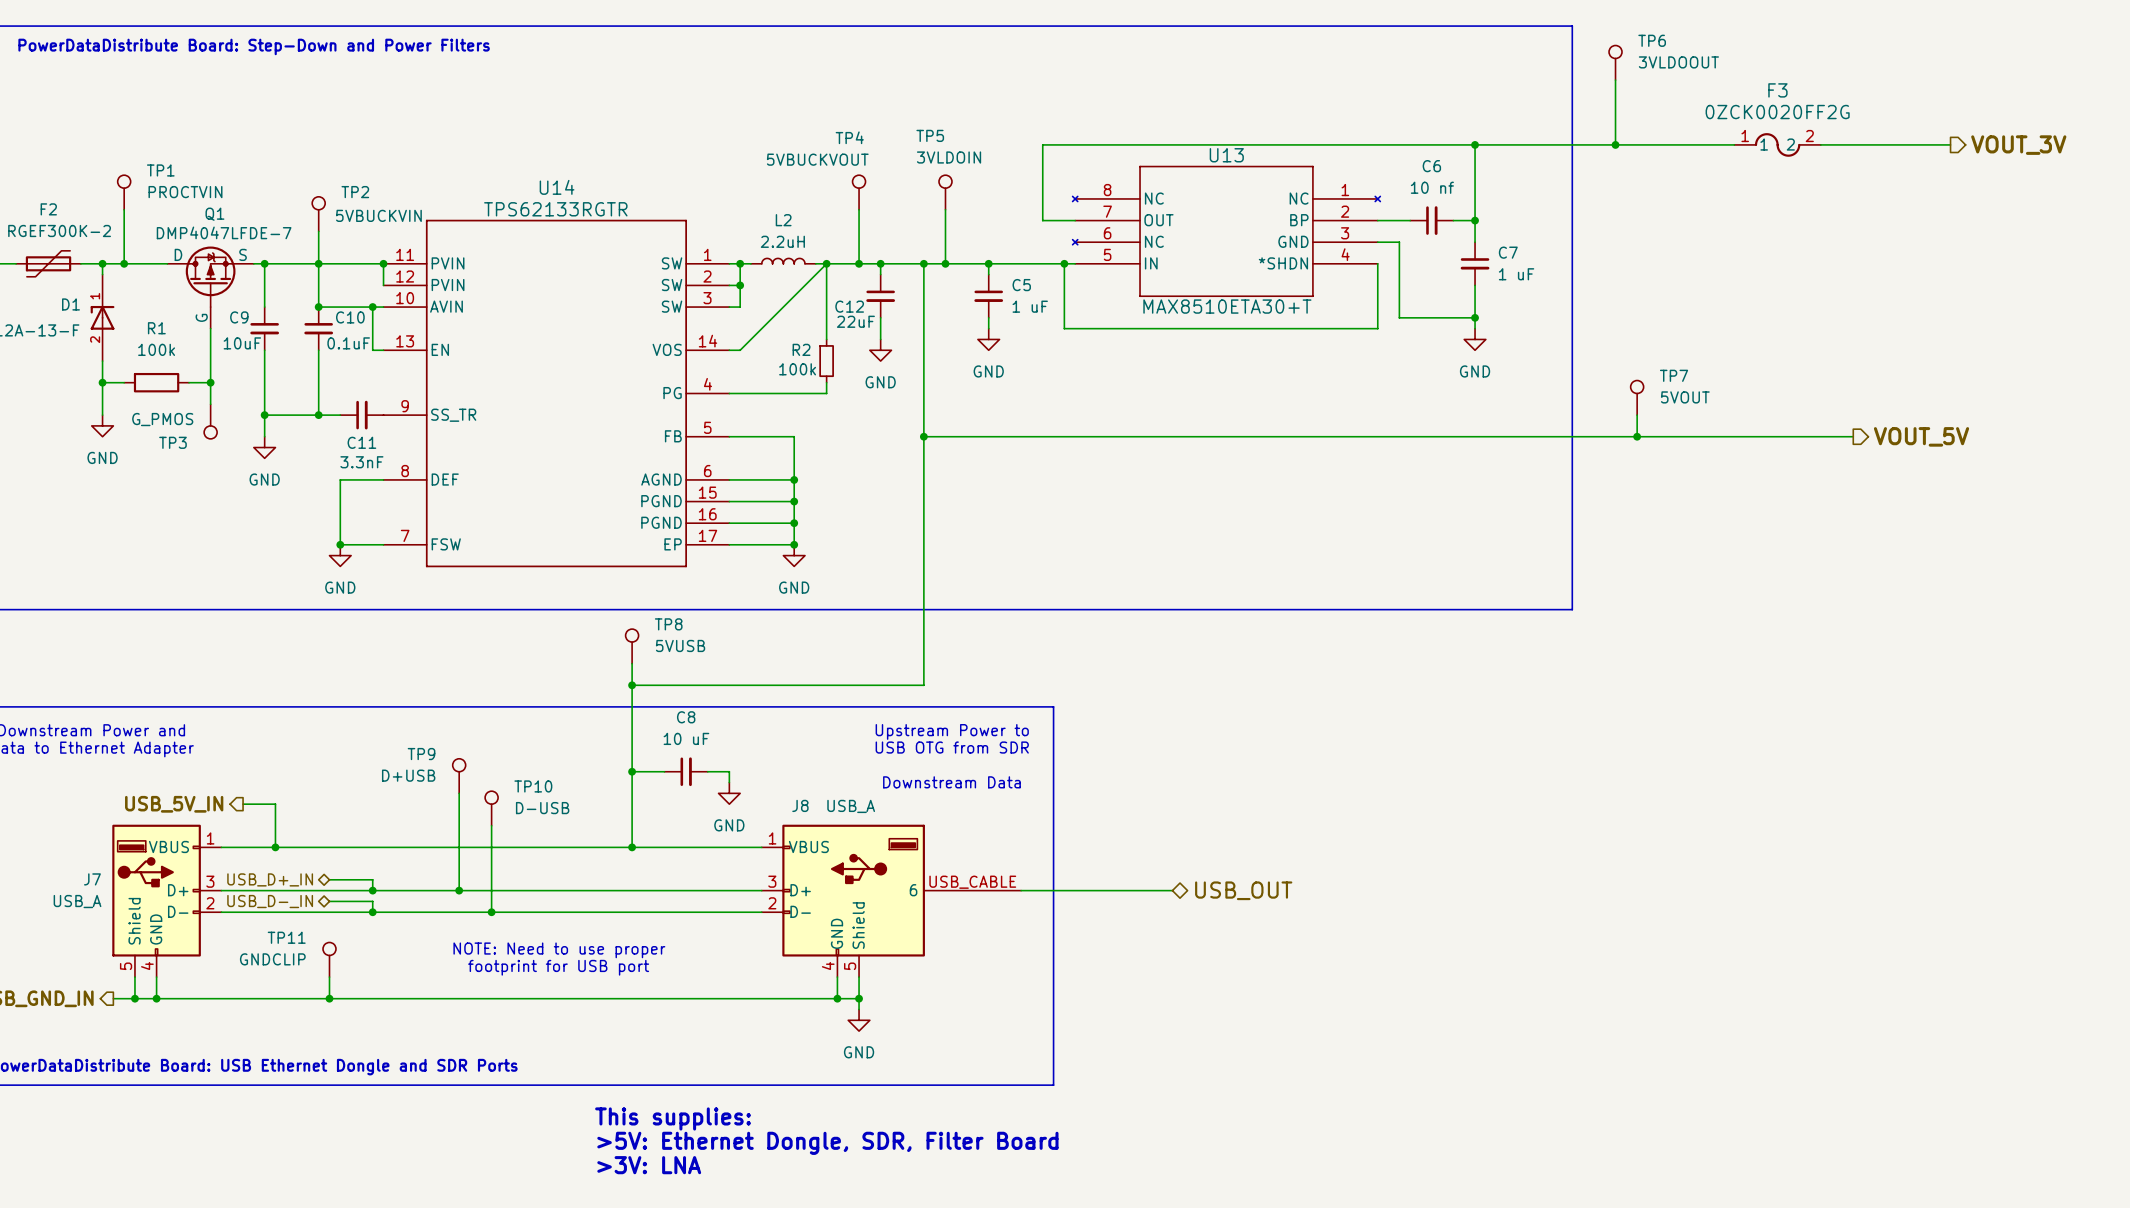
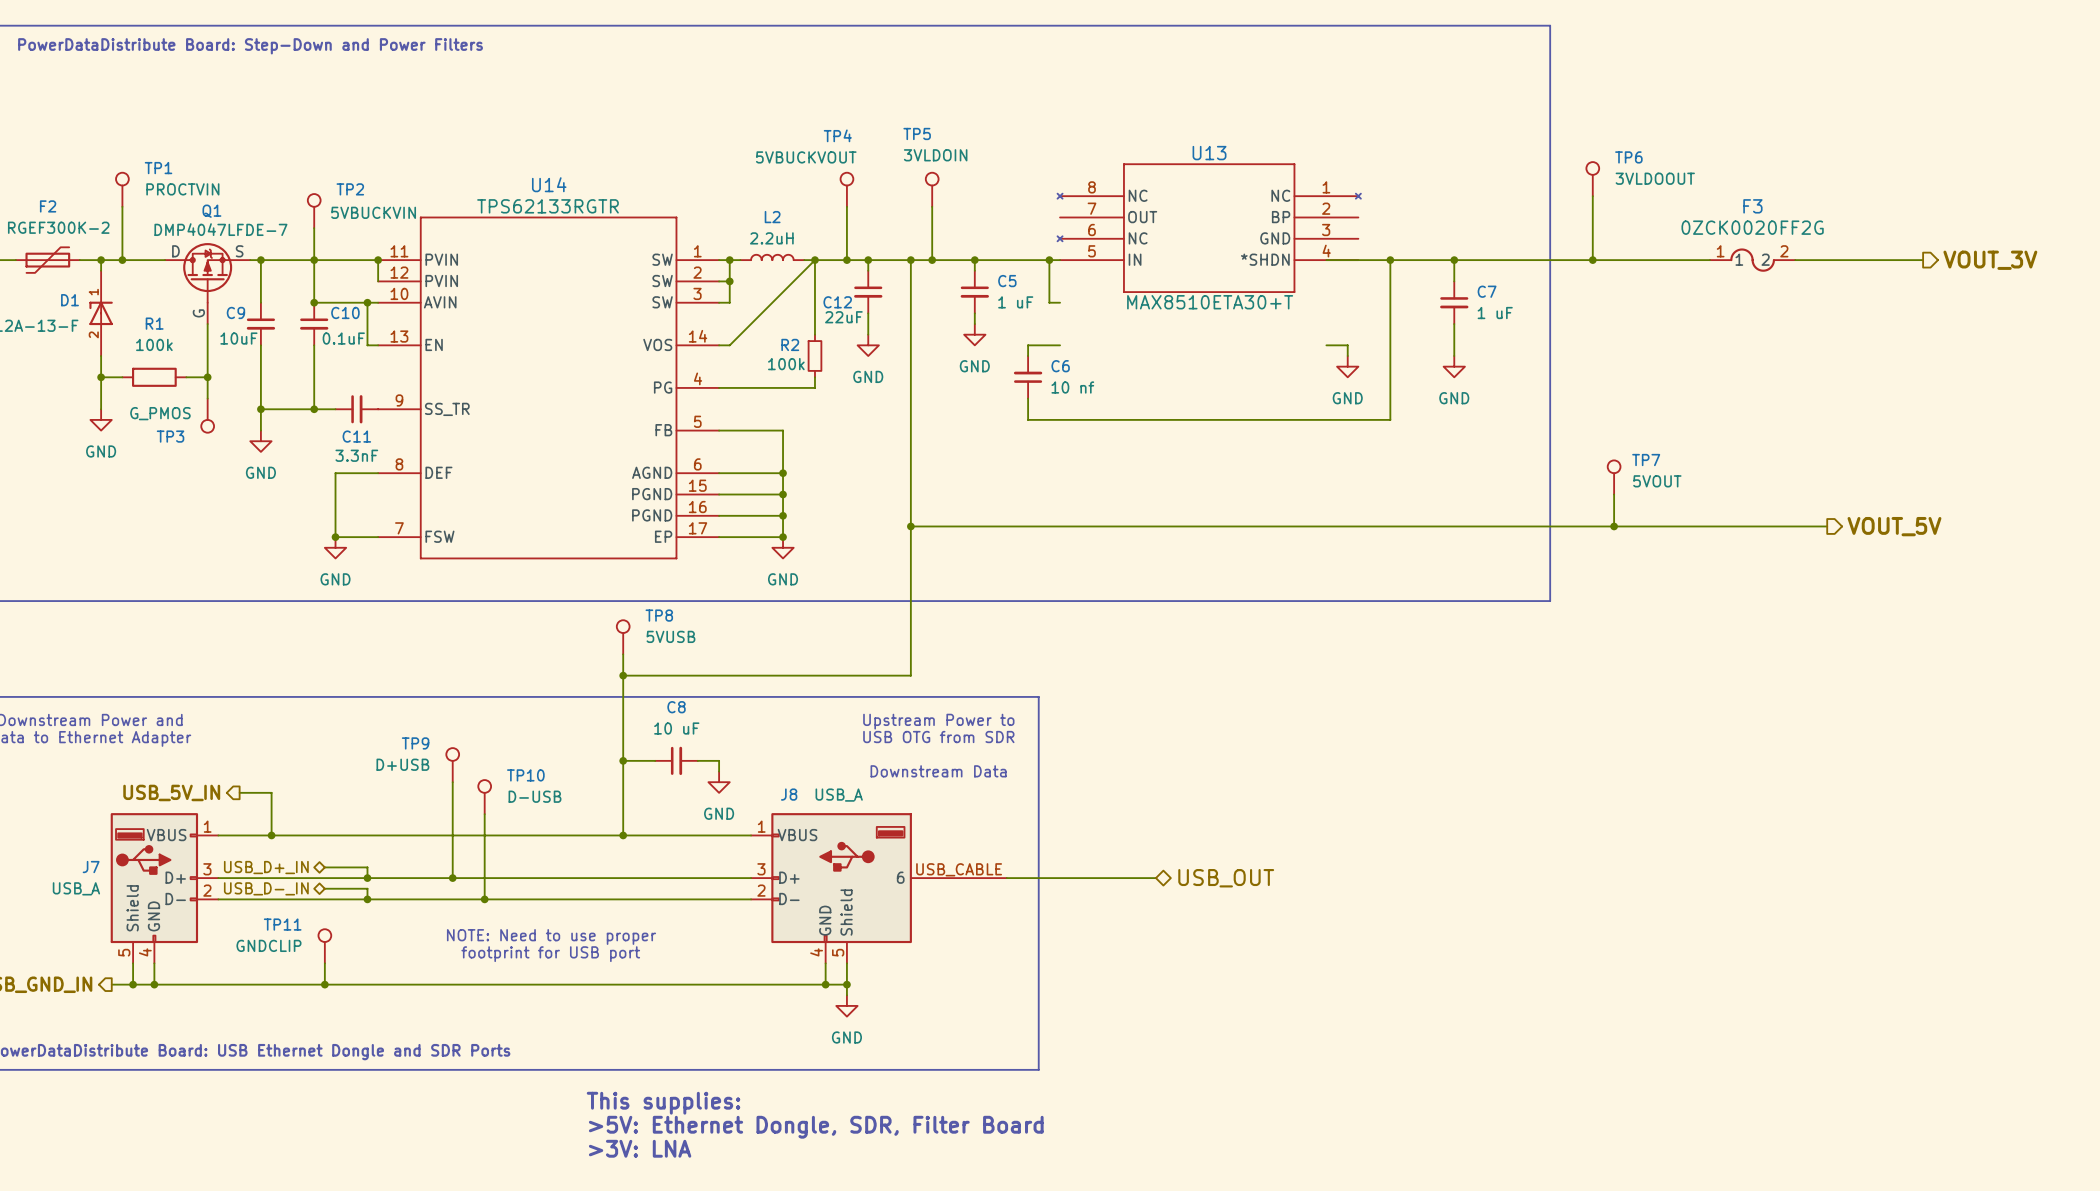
TP6 position: (1615, 62) -> (1592, 179)
wire: (1615, 80) (1615, 144) -> (1592, 196) (1592, 260)
wire: (1475, 144) (1475, 242) -> none
junction: (1475, 144) -> none
junction: (1615, 144) -> none
wire: (1734, 144) (1042, 144) (1042, 220) (1075, 220) -> none
F3 position: (1777, 144) -> (1752, 260)
wire: (1820, 144) (1950, 144) -> (1795, 260) (1923, 260)
hierarchical label position: VOUT_3V (2018, 145) -> VOUT_3V (1990, 260)
C6 name position: C6 (1431, 166) -> C6 (1060, 366)
C6 value position: 10 nf (1432, 187) -> 10 nf (1072, 387)
wire: (1377, 220) (1410, 220) -> none
C6 rotation: 0° (1431, 220) -> 90° counterclockwise (1028, 377)
C6 position: (1431, 220) -> (1028, 377)
wire: (1453, 220) (1475, 220) -> none
junction: (1475, 220) -> none
wire: (1377, 242) (1399, 242) (1399, 317) (1475, 317) -> none
wire: none -> (1326, 260) (1709, 260)
wire: (1377, 263) (1377, 328) (1064, 328) (1064, 307) -> (1060, 302) (1049, 302)
wire: none -> (1390, 260) (1390, 419) (1028, 419) (1028, 398)
junction: none -> (1390, 260)
junction: none -> (1454, 260)
C7 position: (1475, 263) -> (1454, 302)
junction: none -> (1592, 260)
junction: (1475, 317) -> none
wire: none -> (1454, 324) (1454, 355)
power symbol position: GND (1475, 339) -> GND (1454, 366)
wire: none -> (1060, 345) (1028, 345) (1028, 355)
wire: none -> (1326, 345) (1347, 345) (1347, 355)
power symbol: none -> GND (1347, 366)
TP7 name position: TP7 (1674, 375) -> TP7 (1646, 460)
TP7 position: (1637, 397) -> (1614, 477)
TP7 value position: 5VOUT (1685, 397) -> 5VOUT (1657, 481)
wire: (1637, 415) (1637, 436) -> none
wire: (923, 436) (1853, 436) -> (910, 526) (1827, 526)
junction: (923, 436) -> none
junction: (1637, 436) -> none
hierarchical label position: VOUT_5V (1921, 436) -> VOUT_5V (1894, 526)
wire: none -> (1614, 494) (1614, 526)
junction: none -> (910, 526)
junction: none -> (1614, 526)

